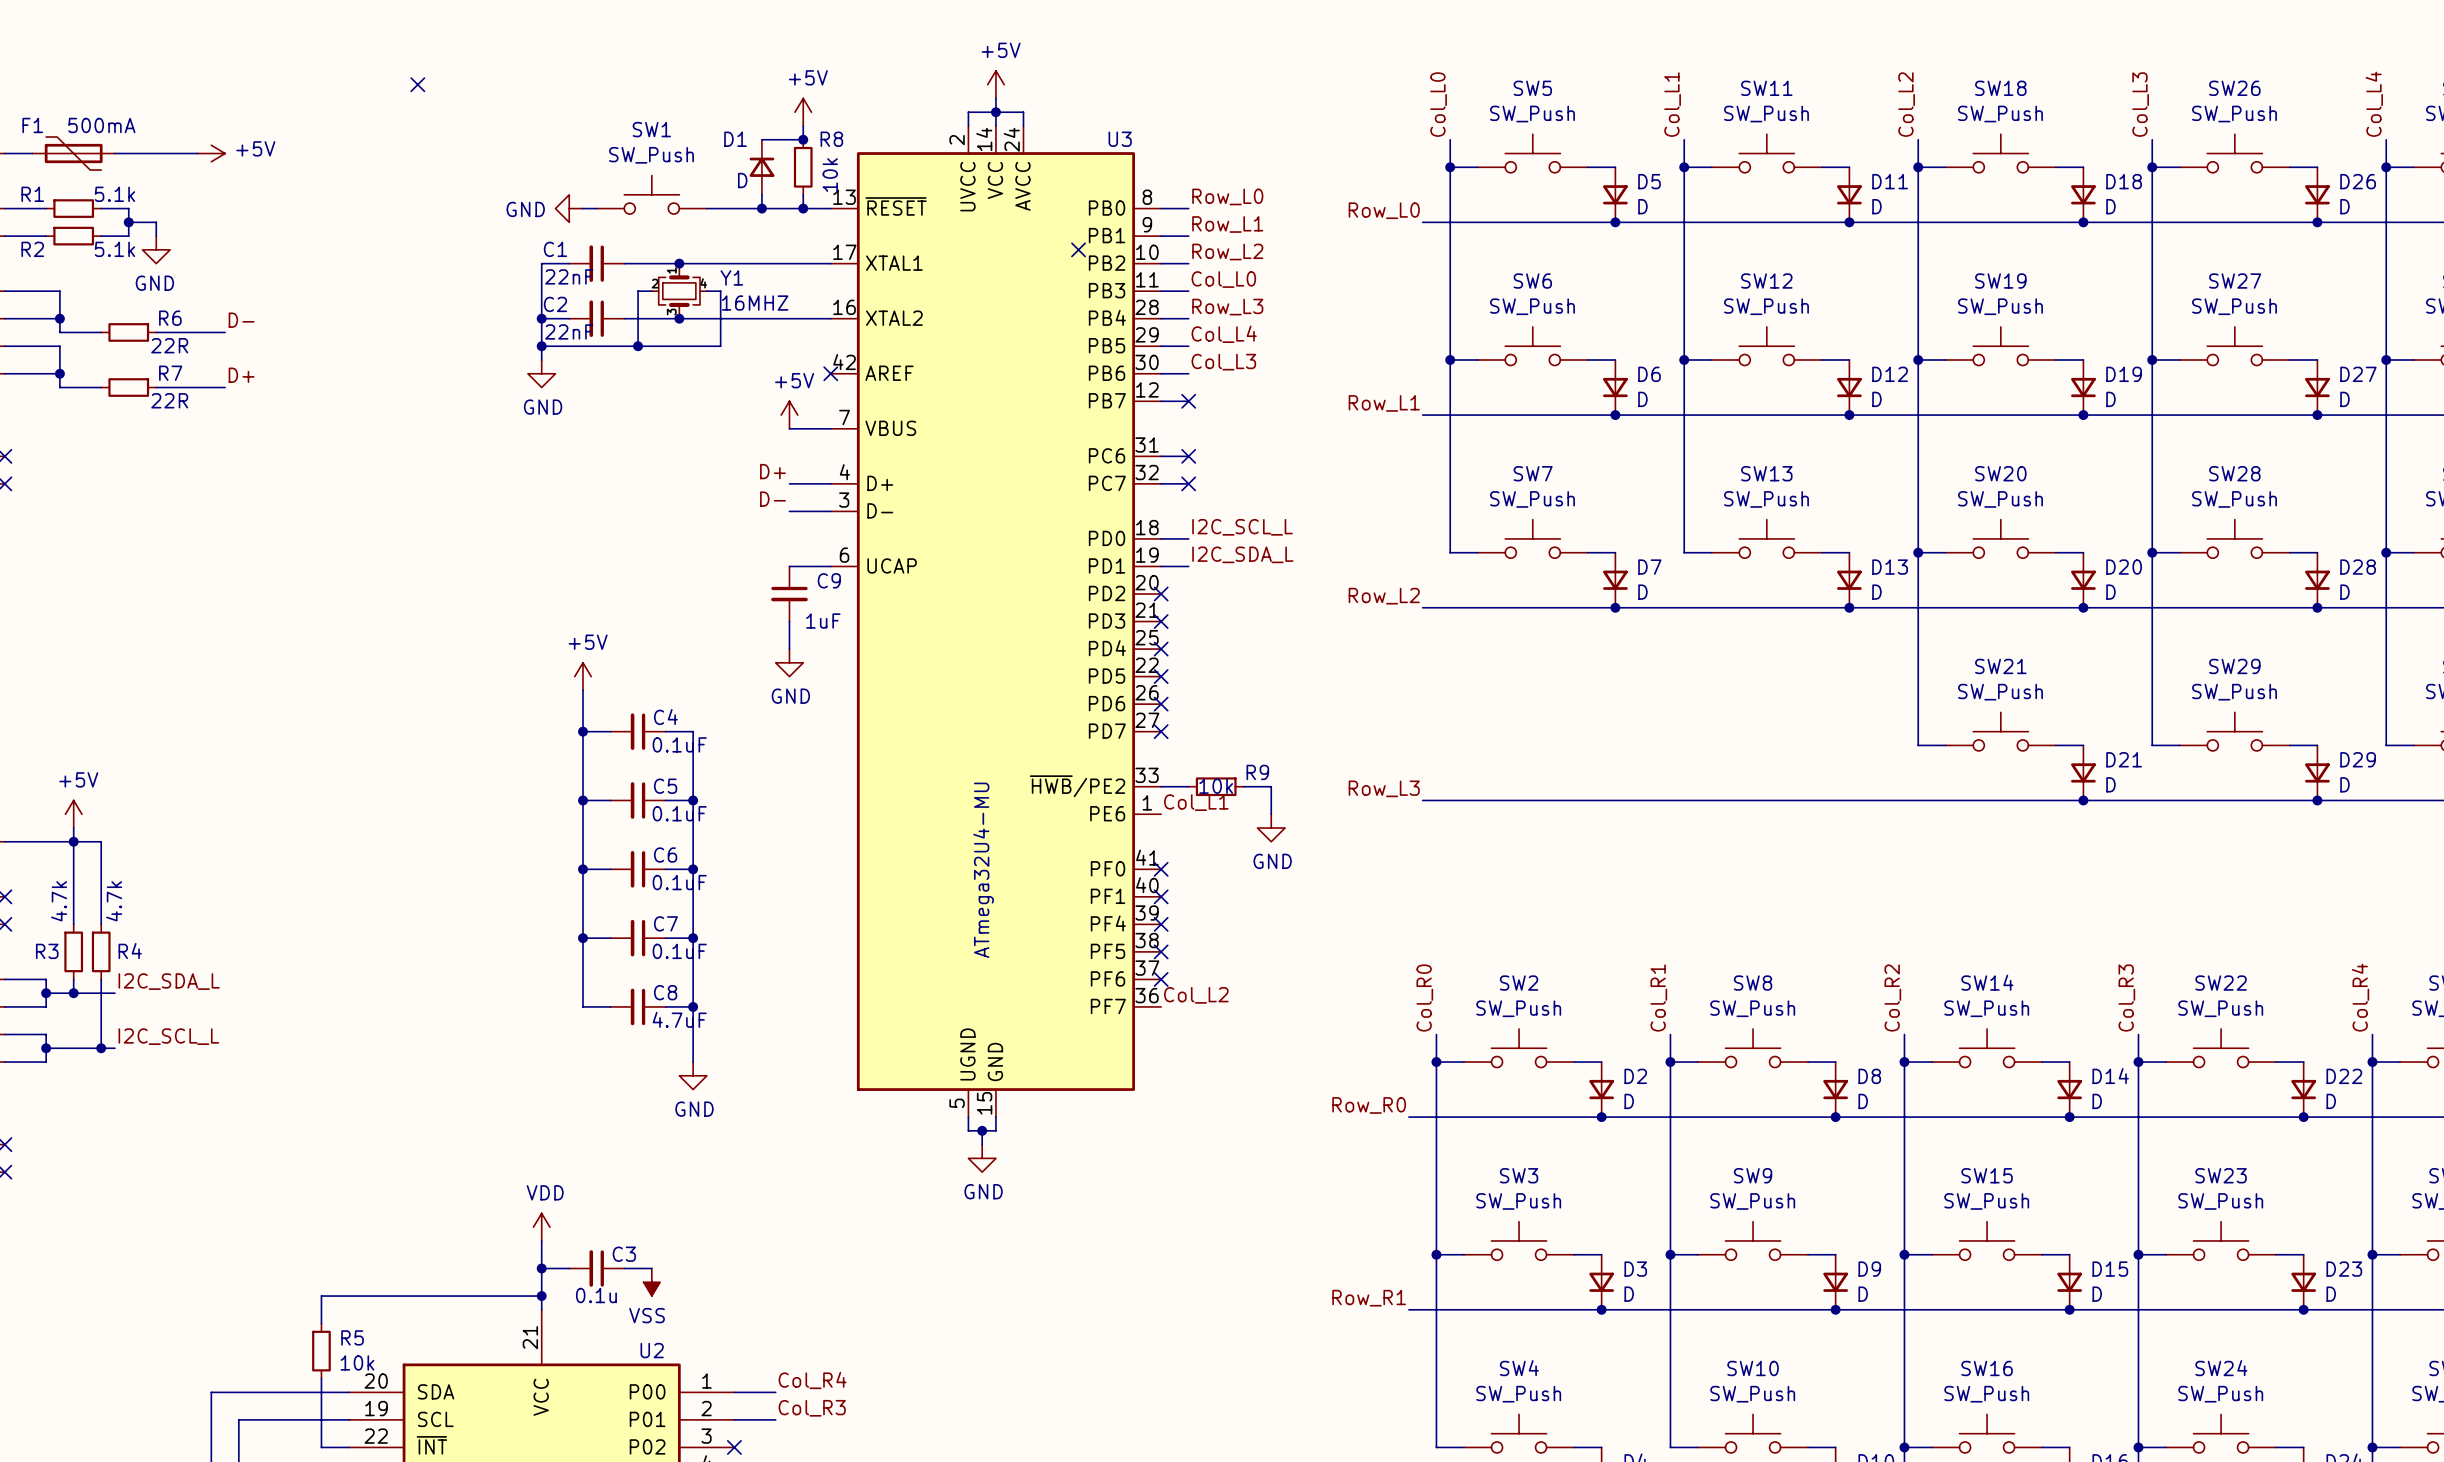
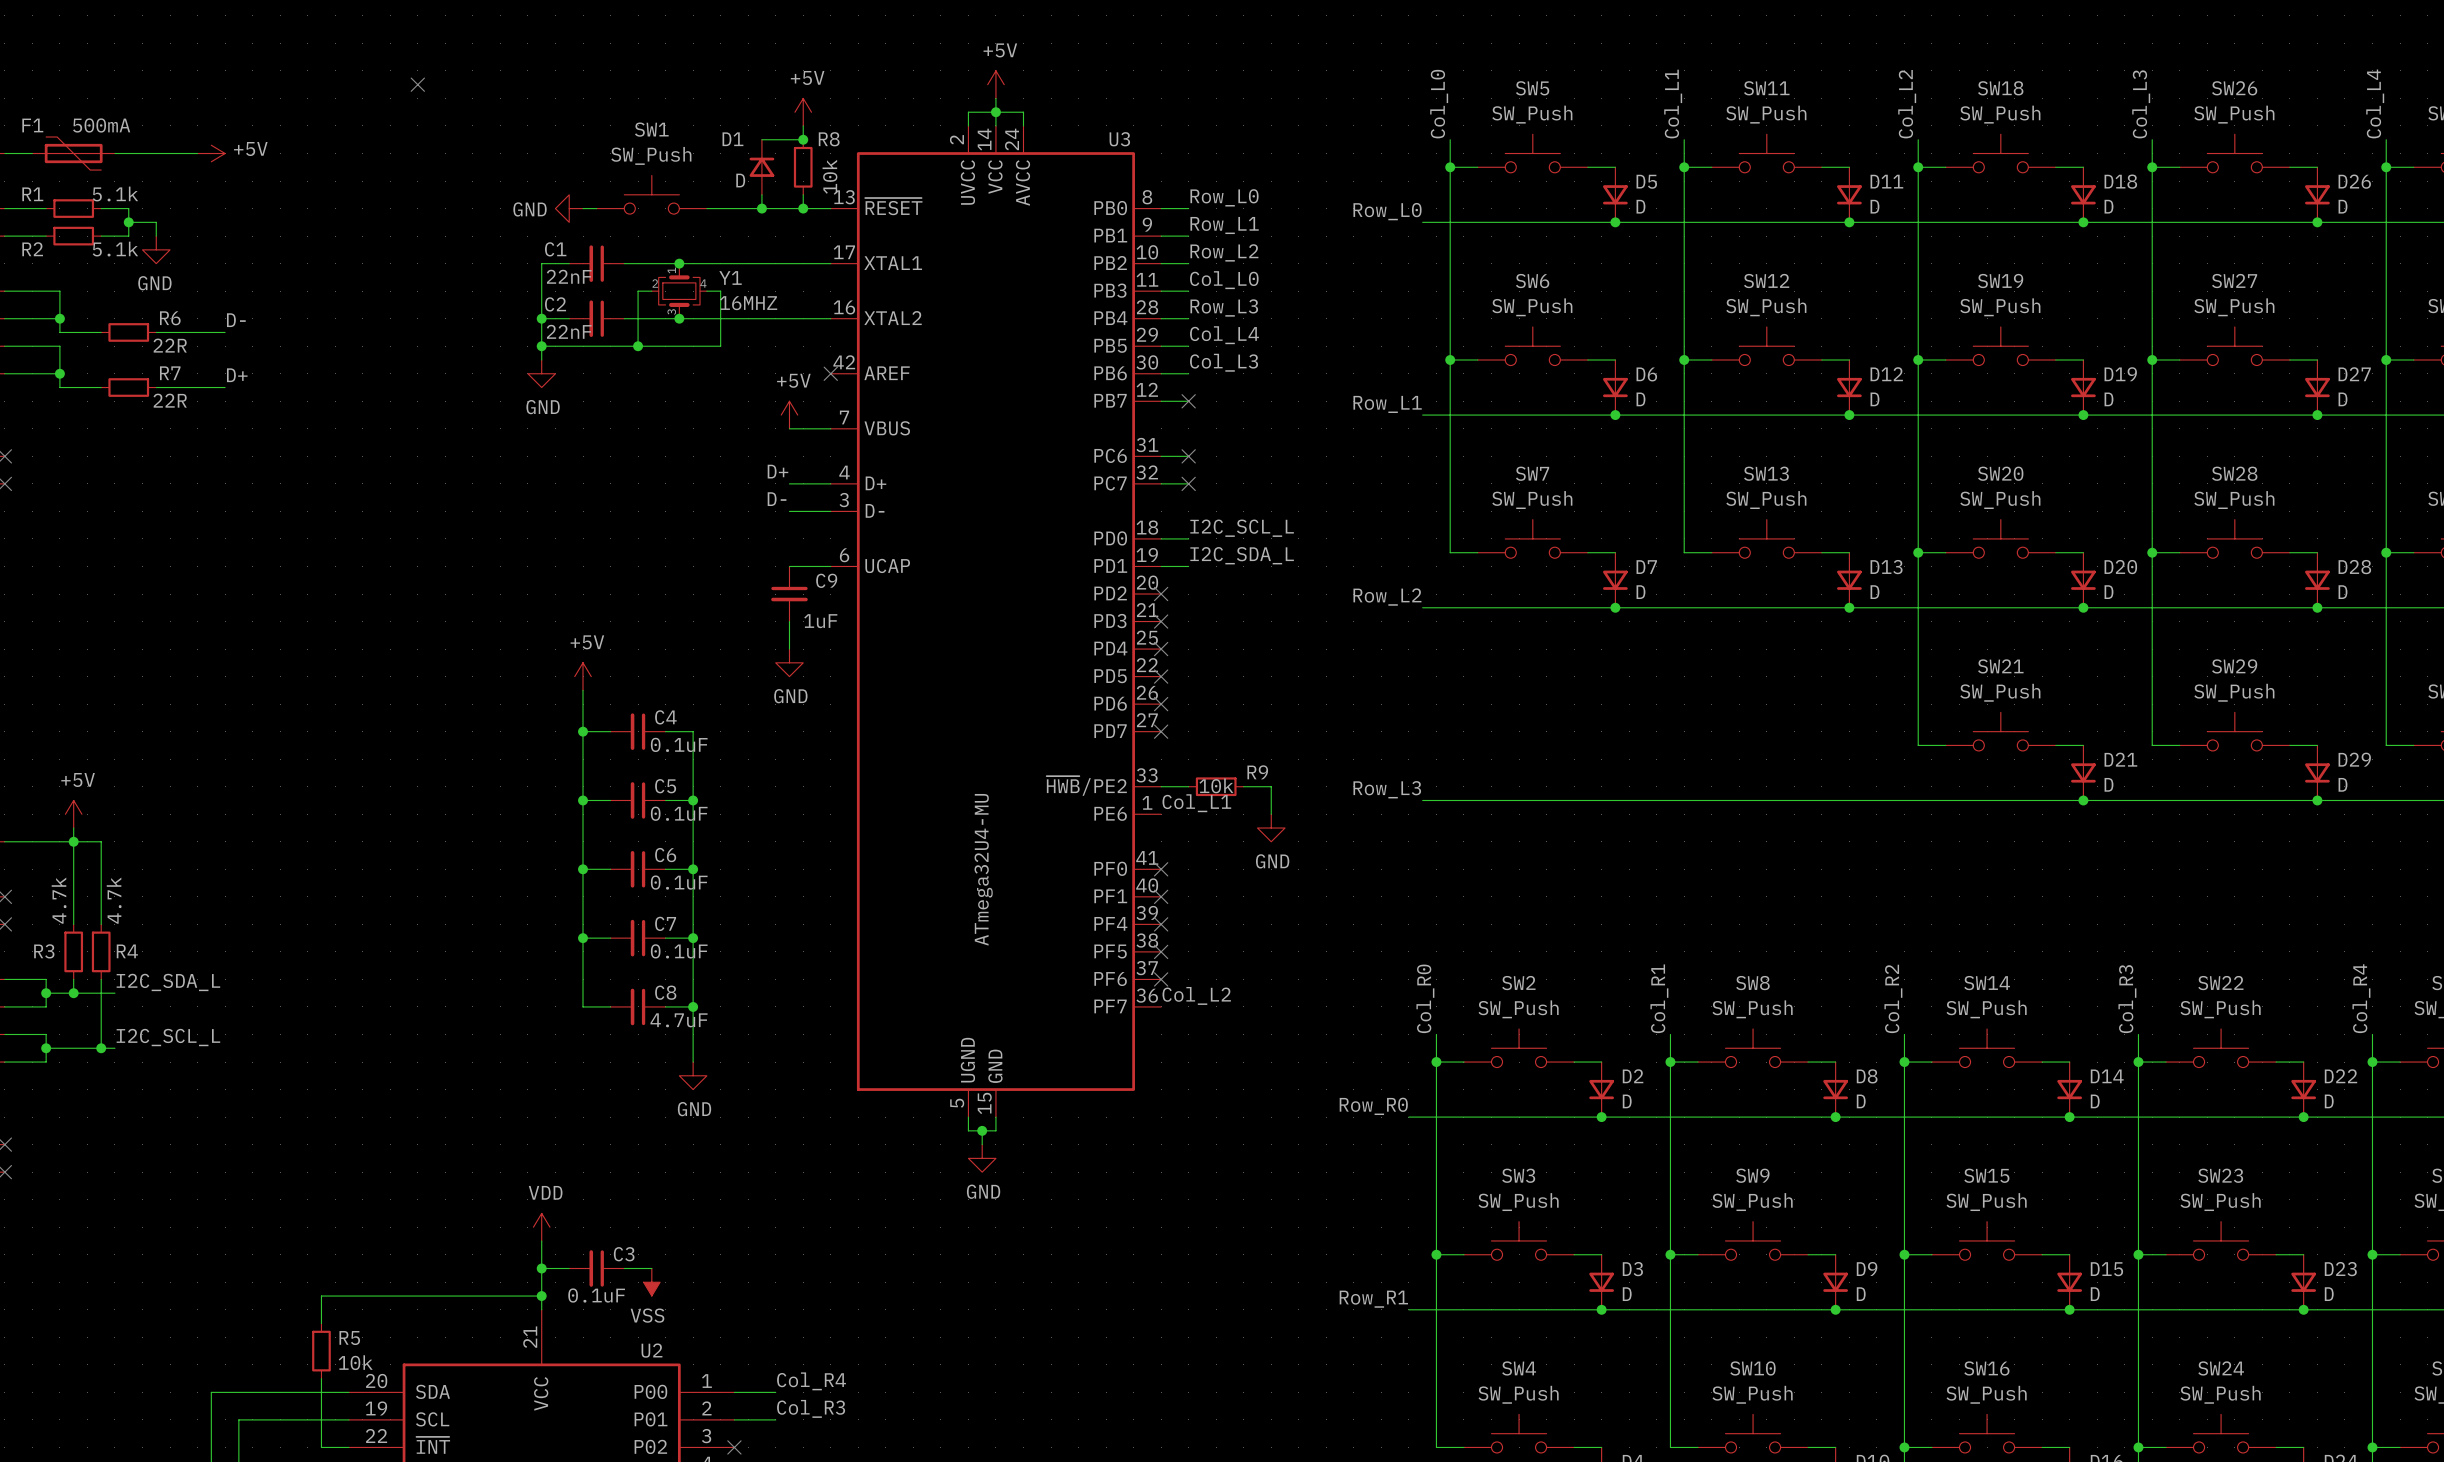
no-connect mark: (1078, 249) -> none
C3 value: 0.1u (596, 1295) -> 0.1uF (596, 1295)

